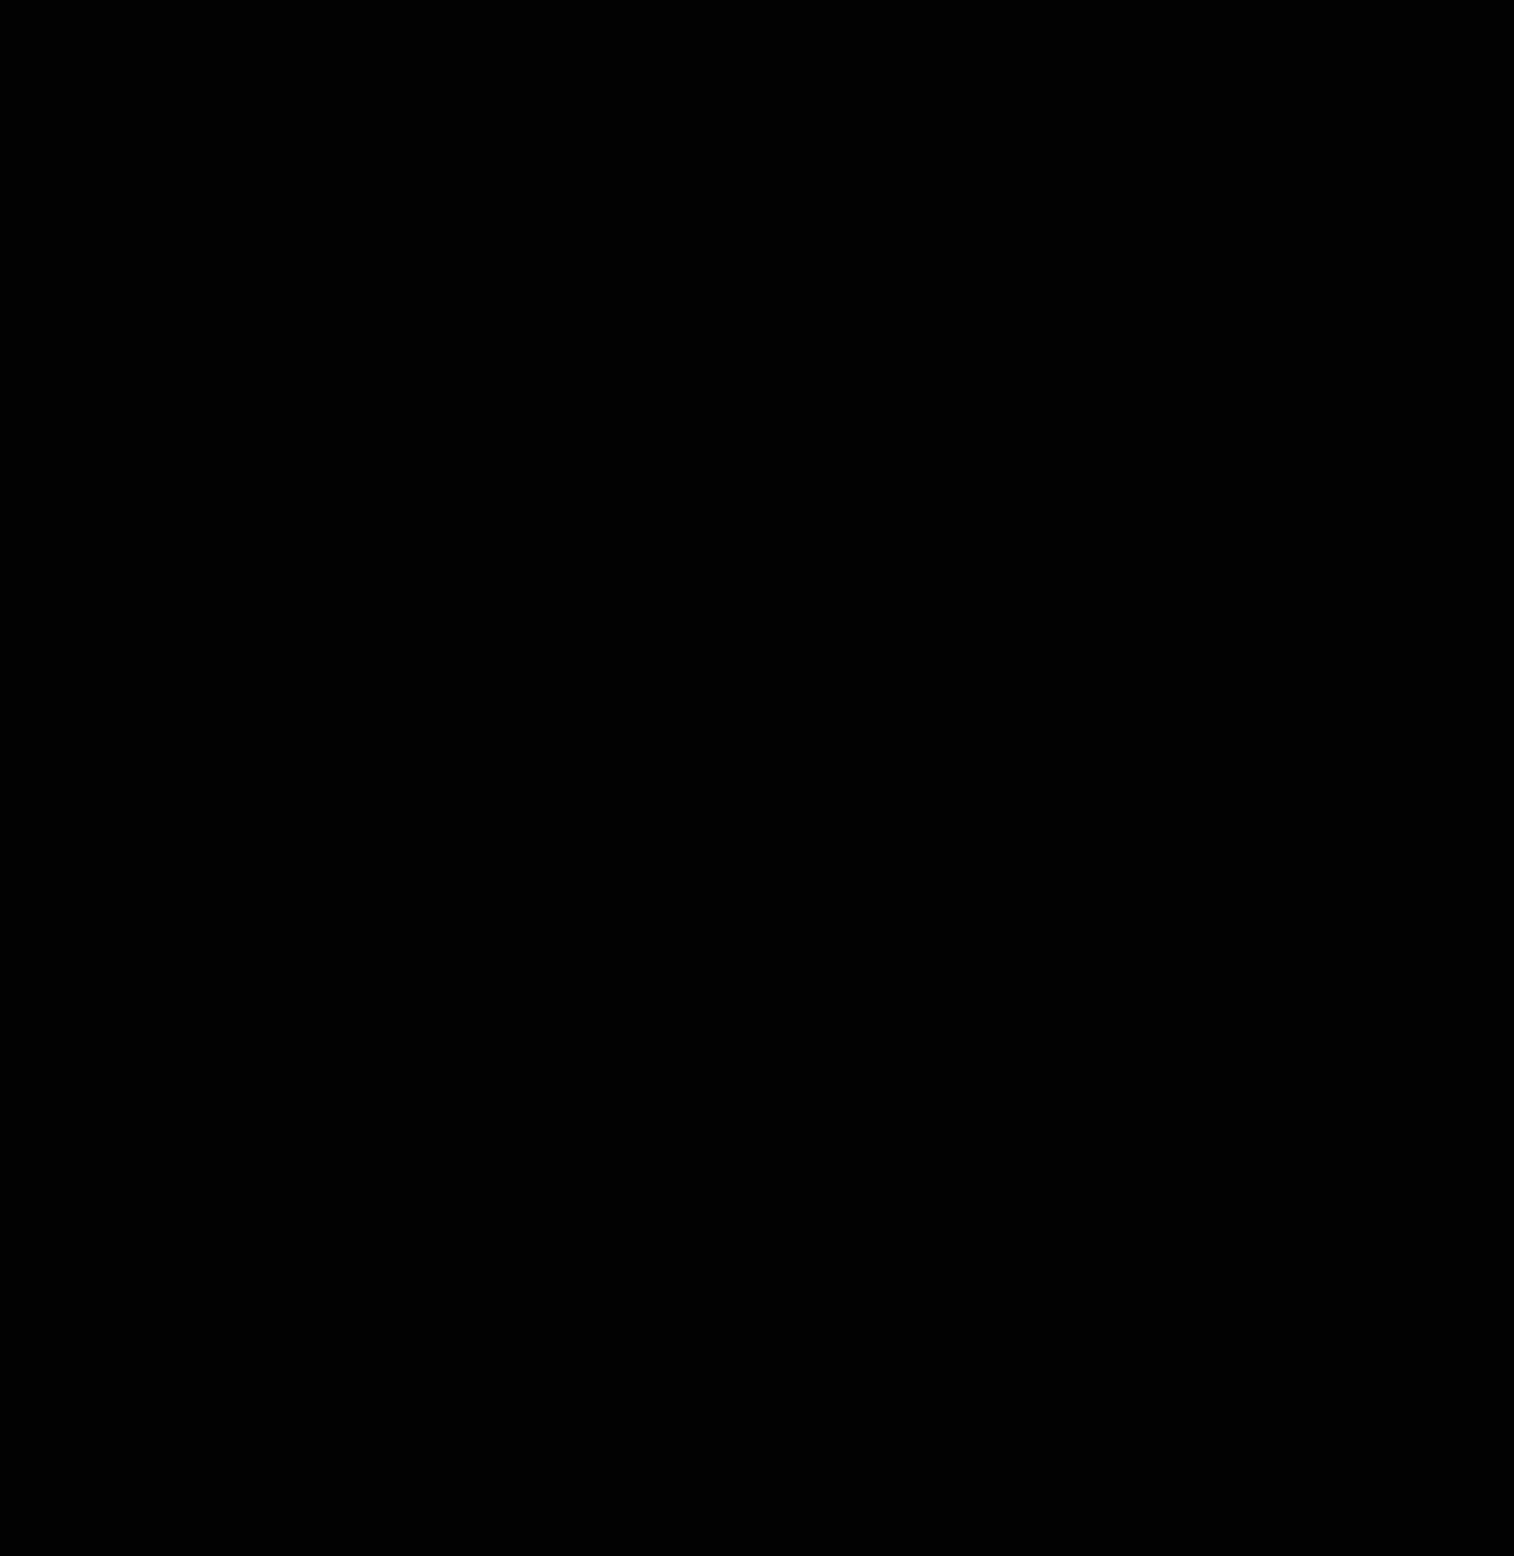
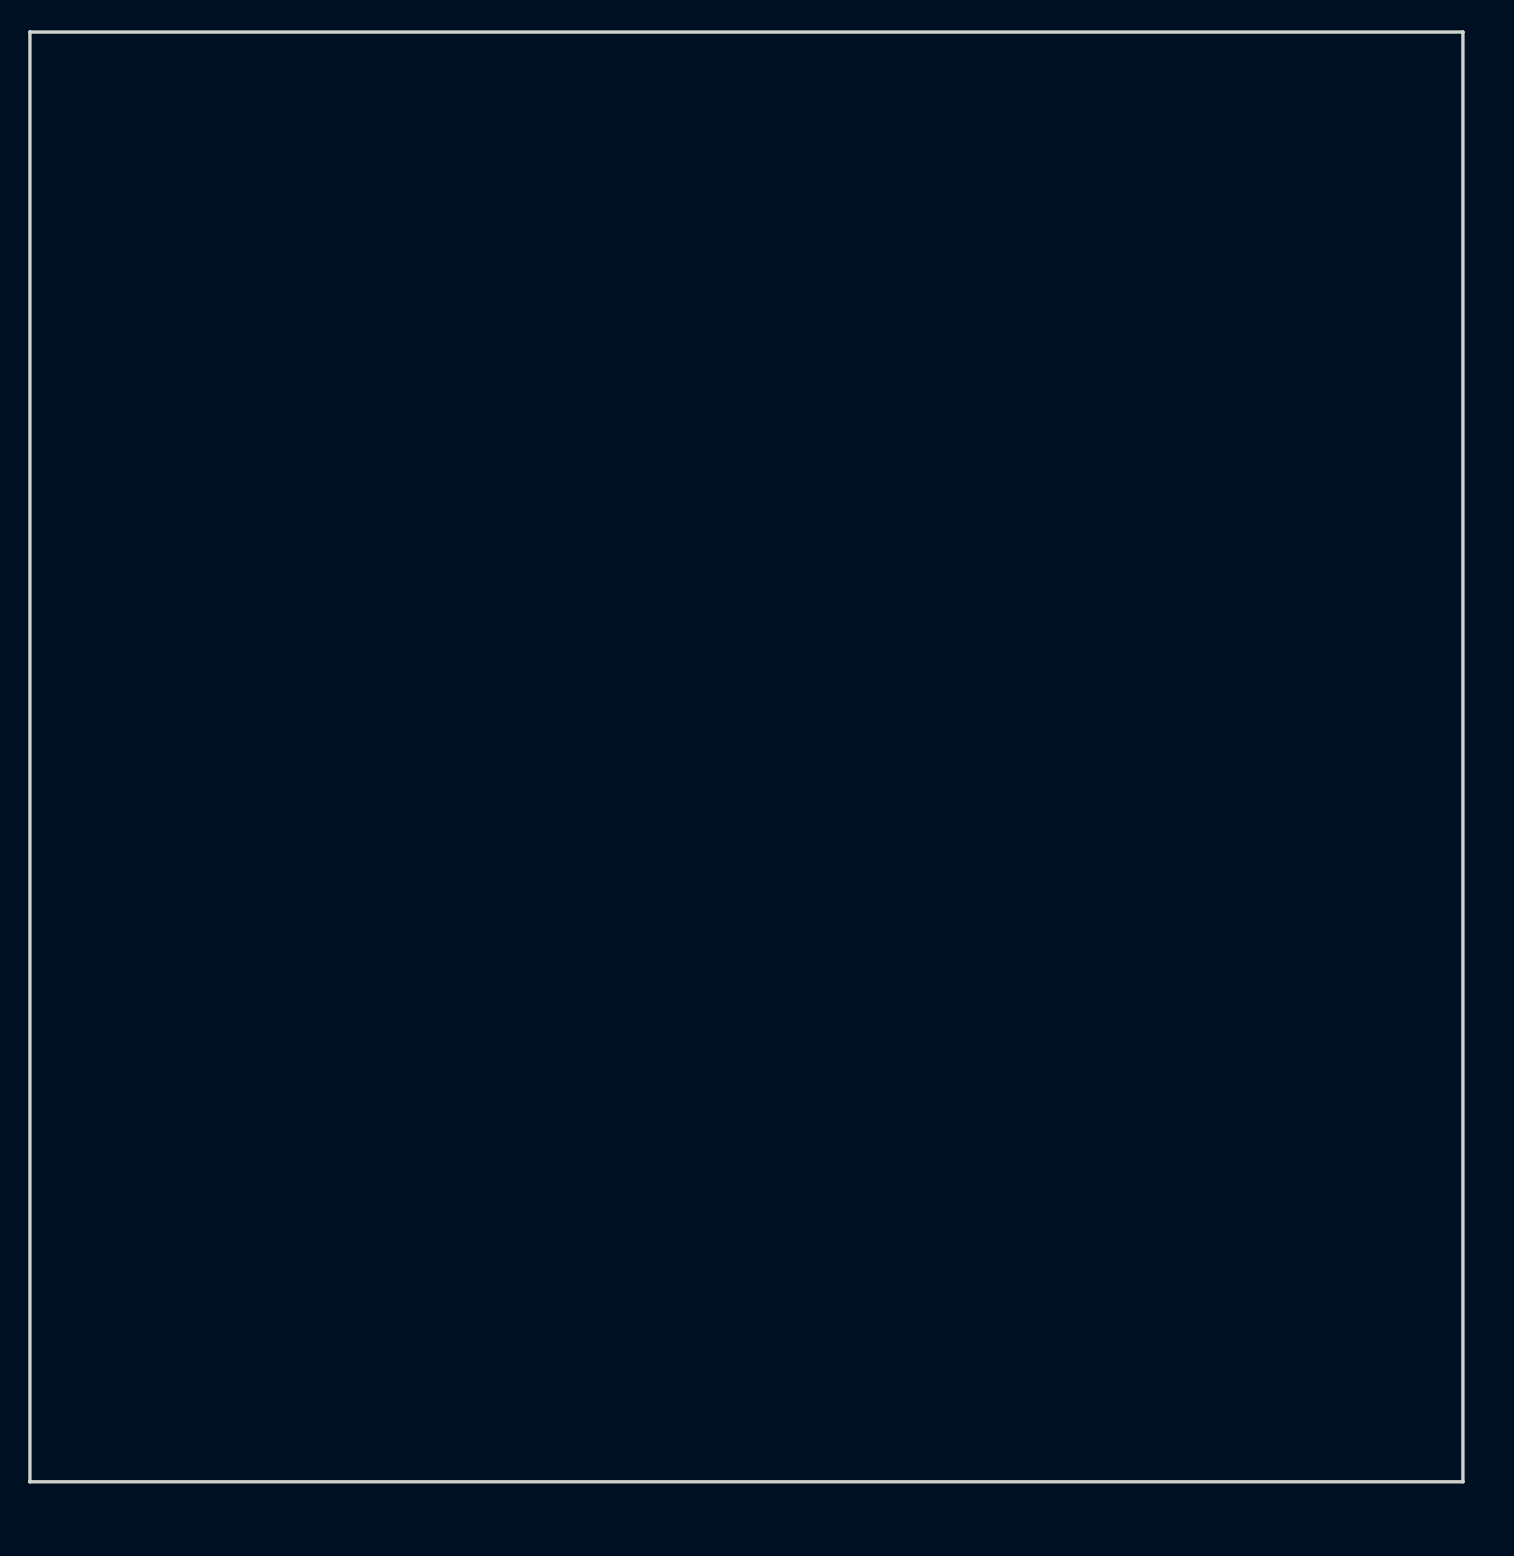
board edge: none -> (29, 32) (1462, 32) (1462, 1481) (29, 1481) (29, 32)

